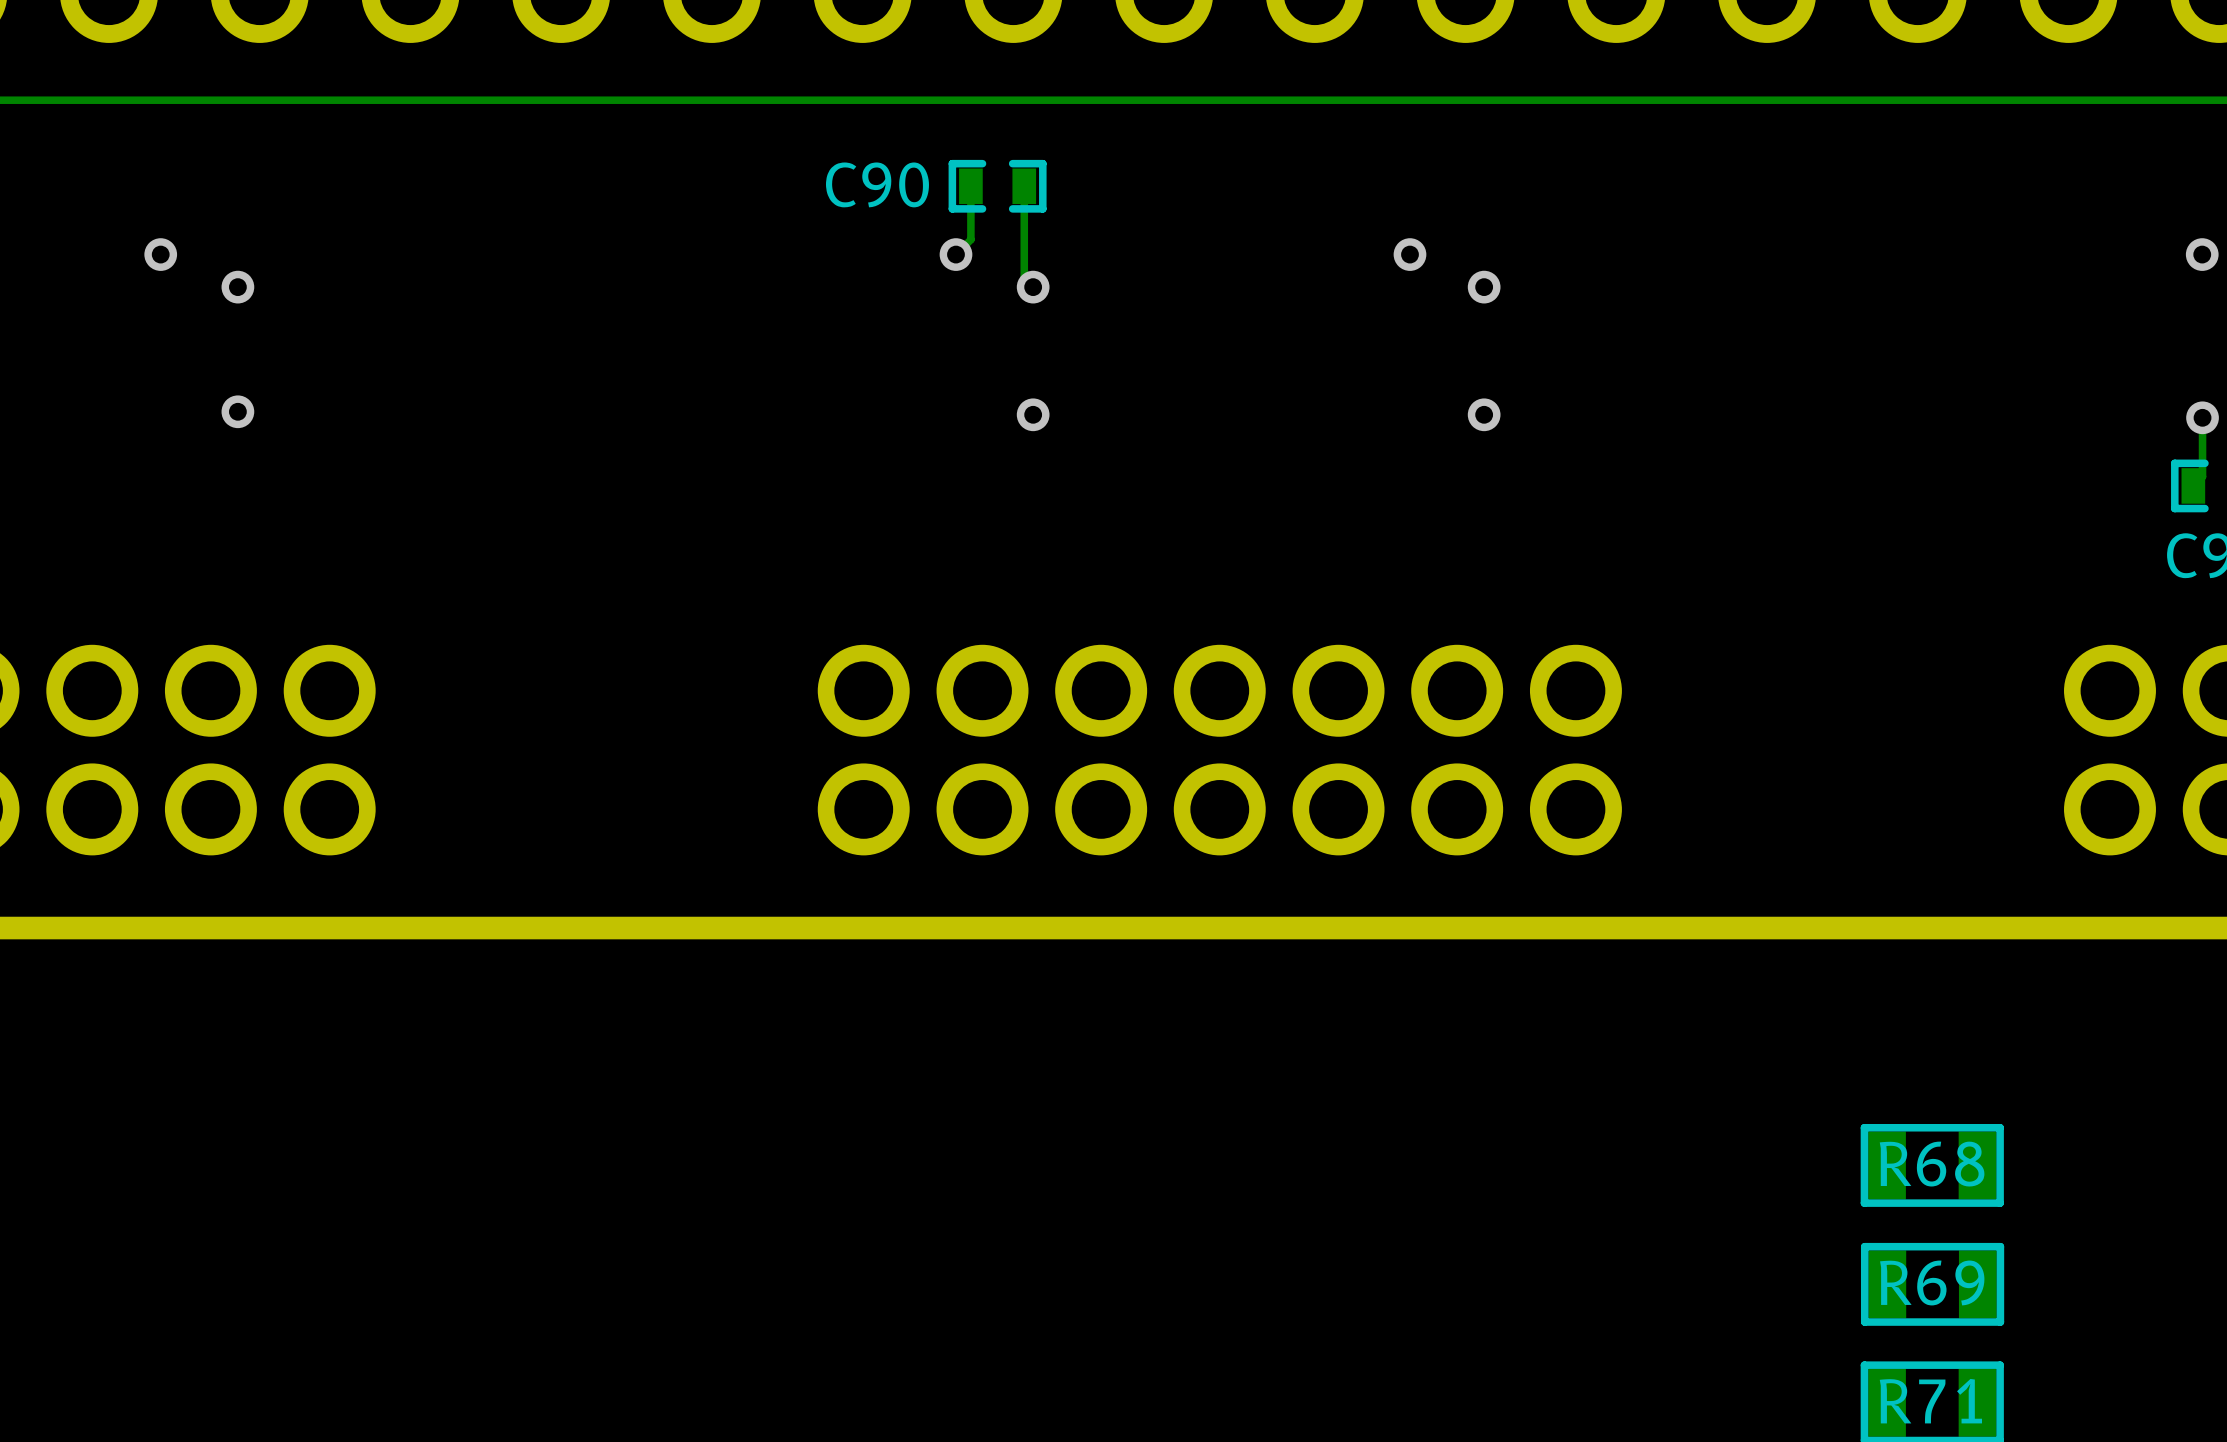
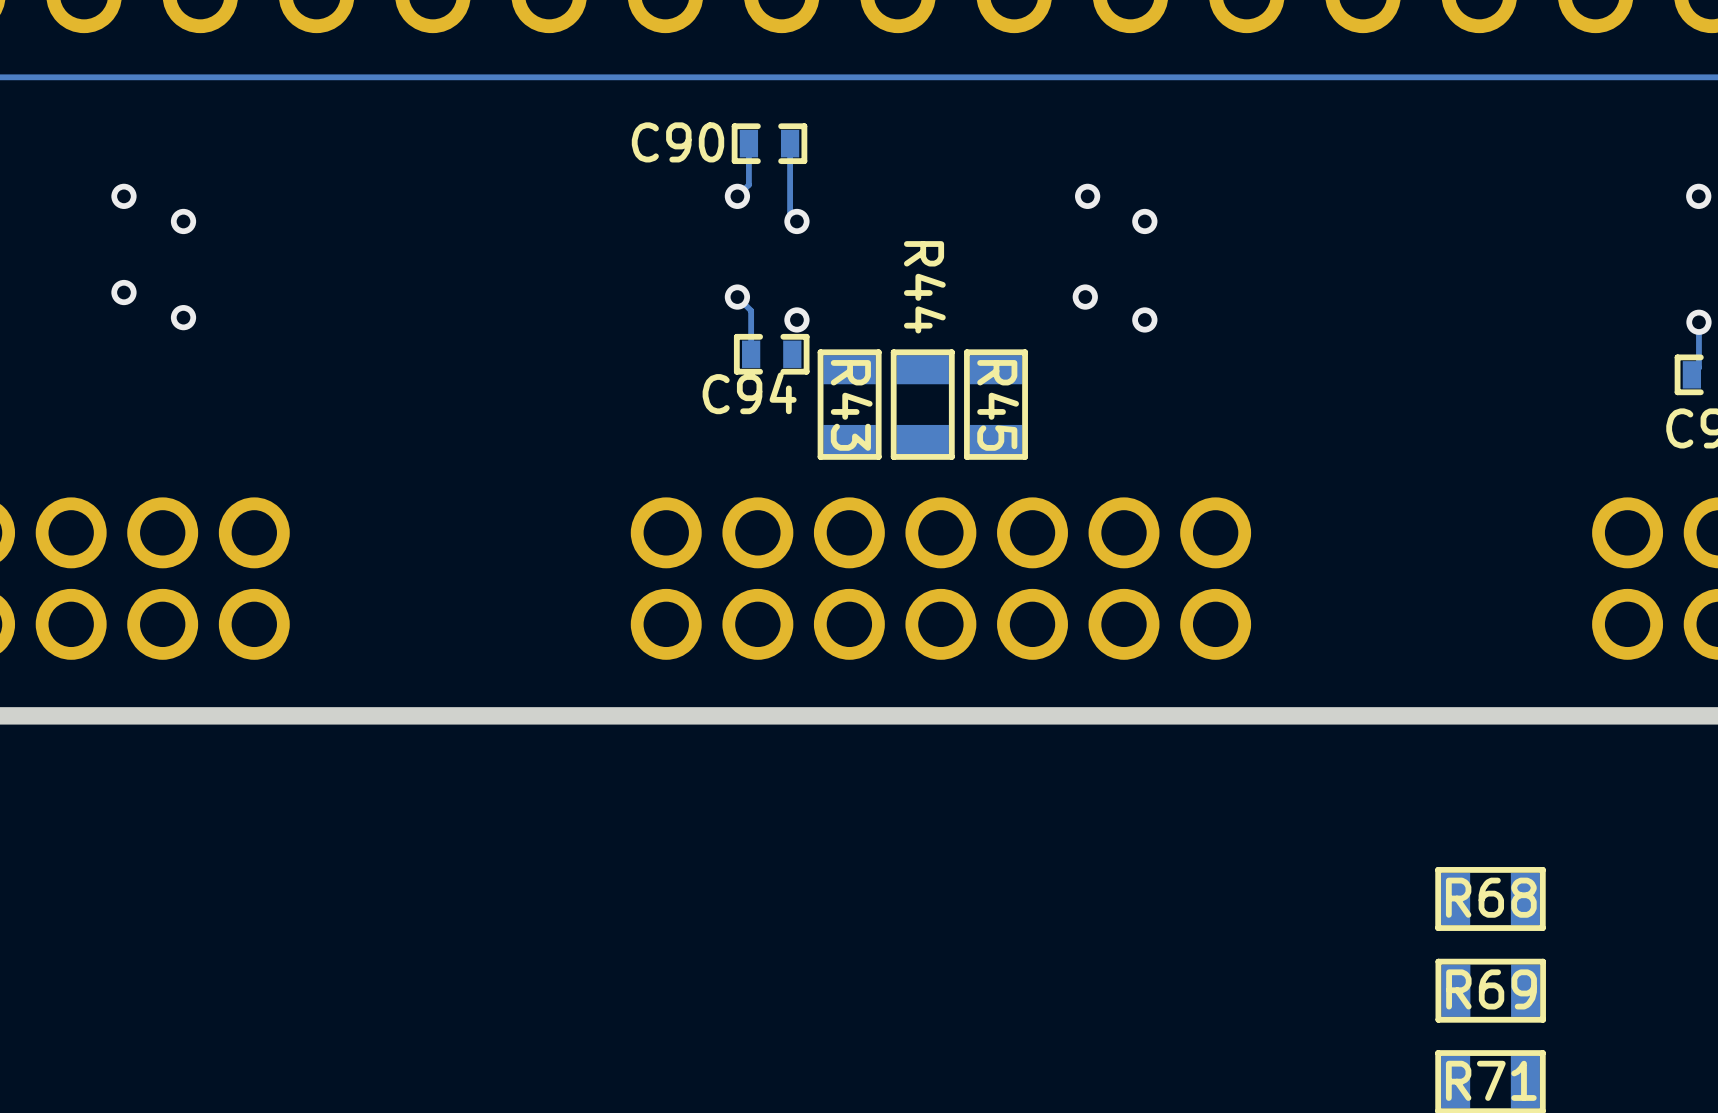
via: none -> (123, 292)
track: none -> (737, 297) (751, 310) (751, 354)
via: none -> (737, 297)
via: none -> (1085, 297)
C94: none -> (771, 354)
R43: none -> (849, 404)
R44: none -> (922, 404)
R45: none -> (996, 404)

